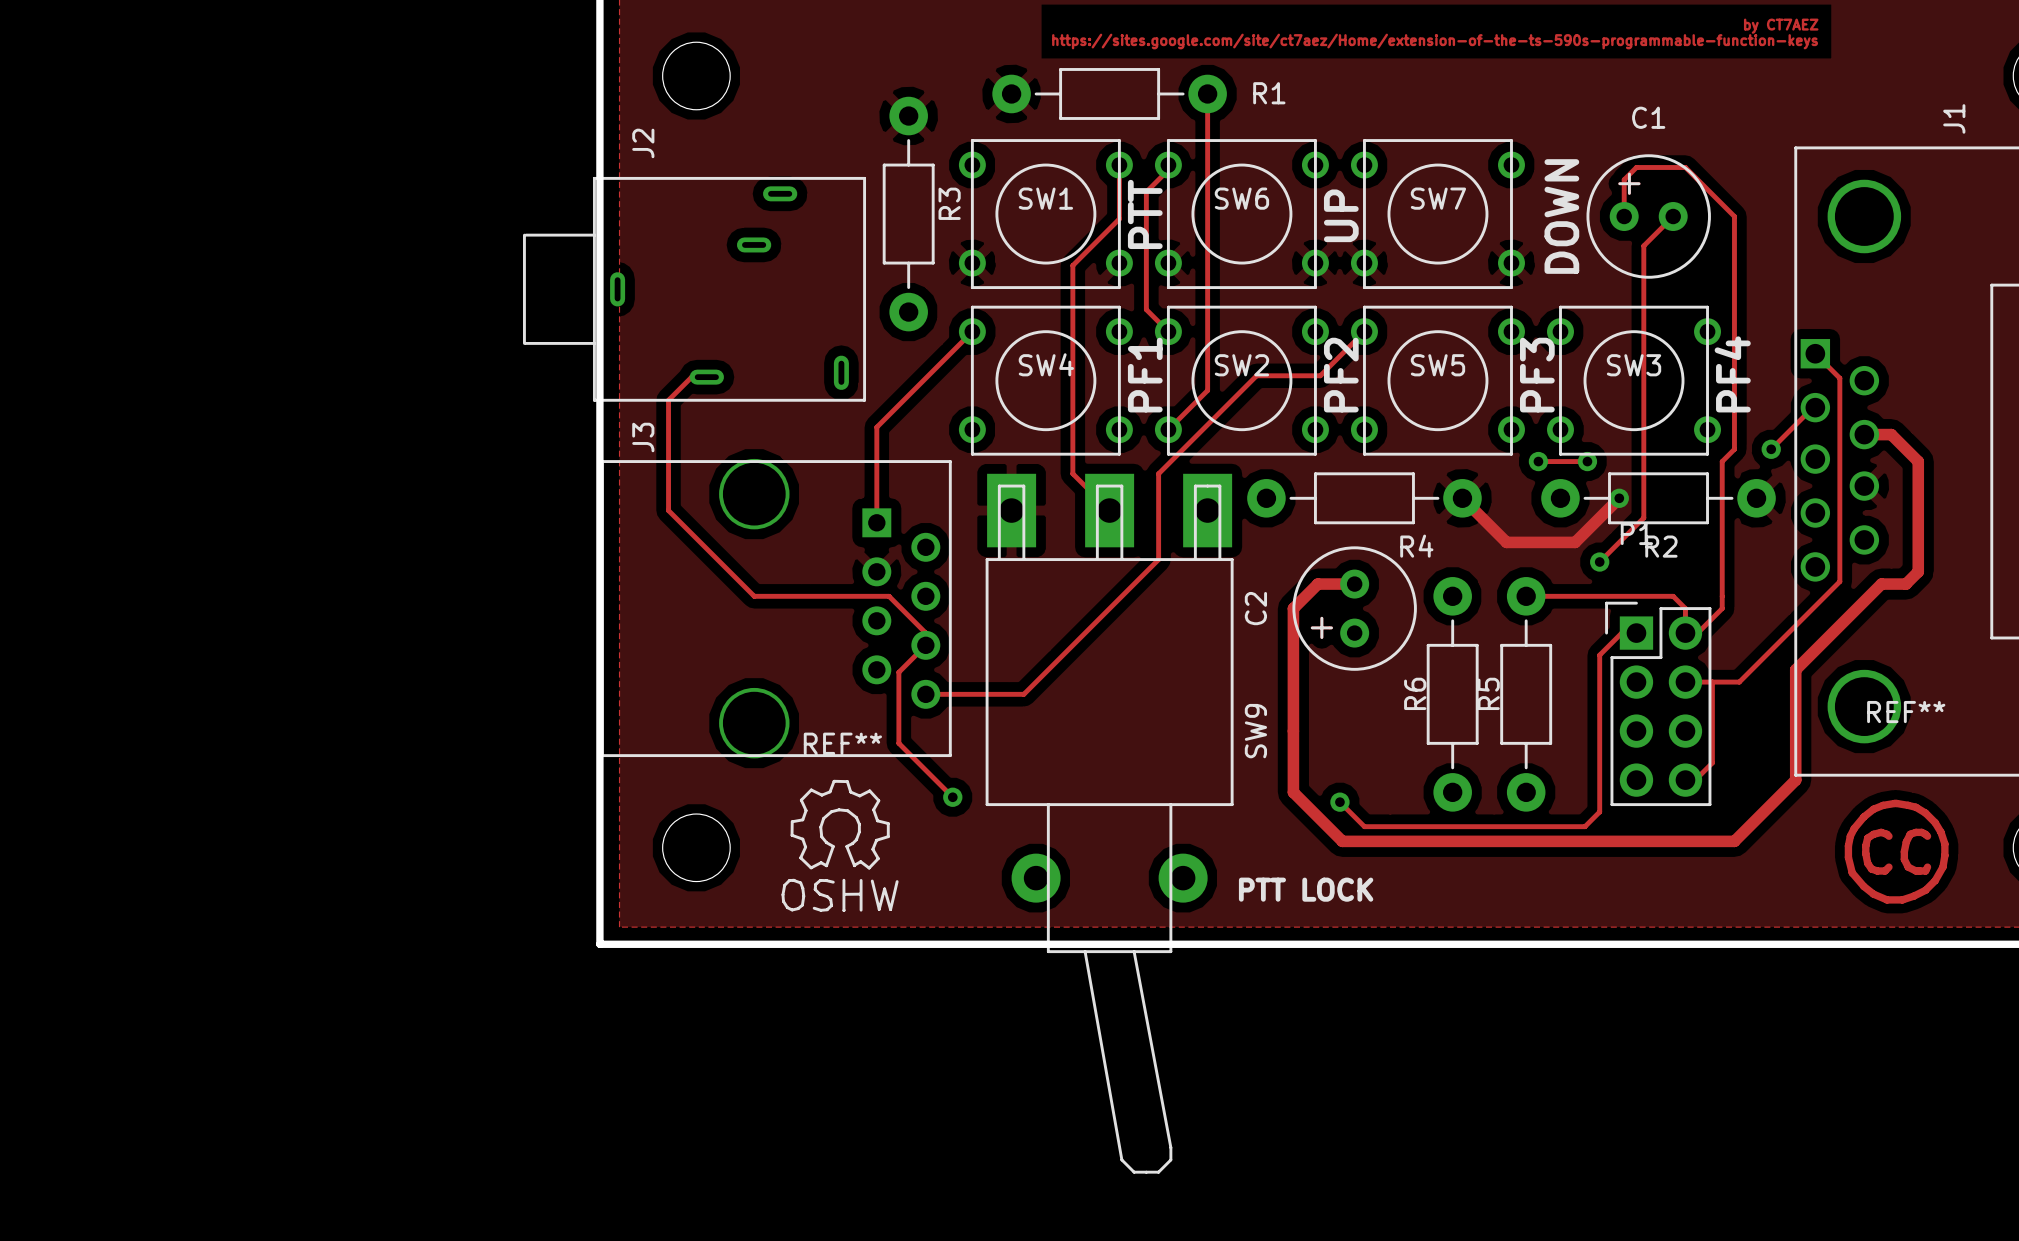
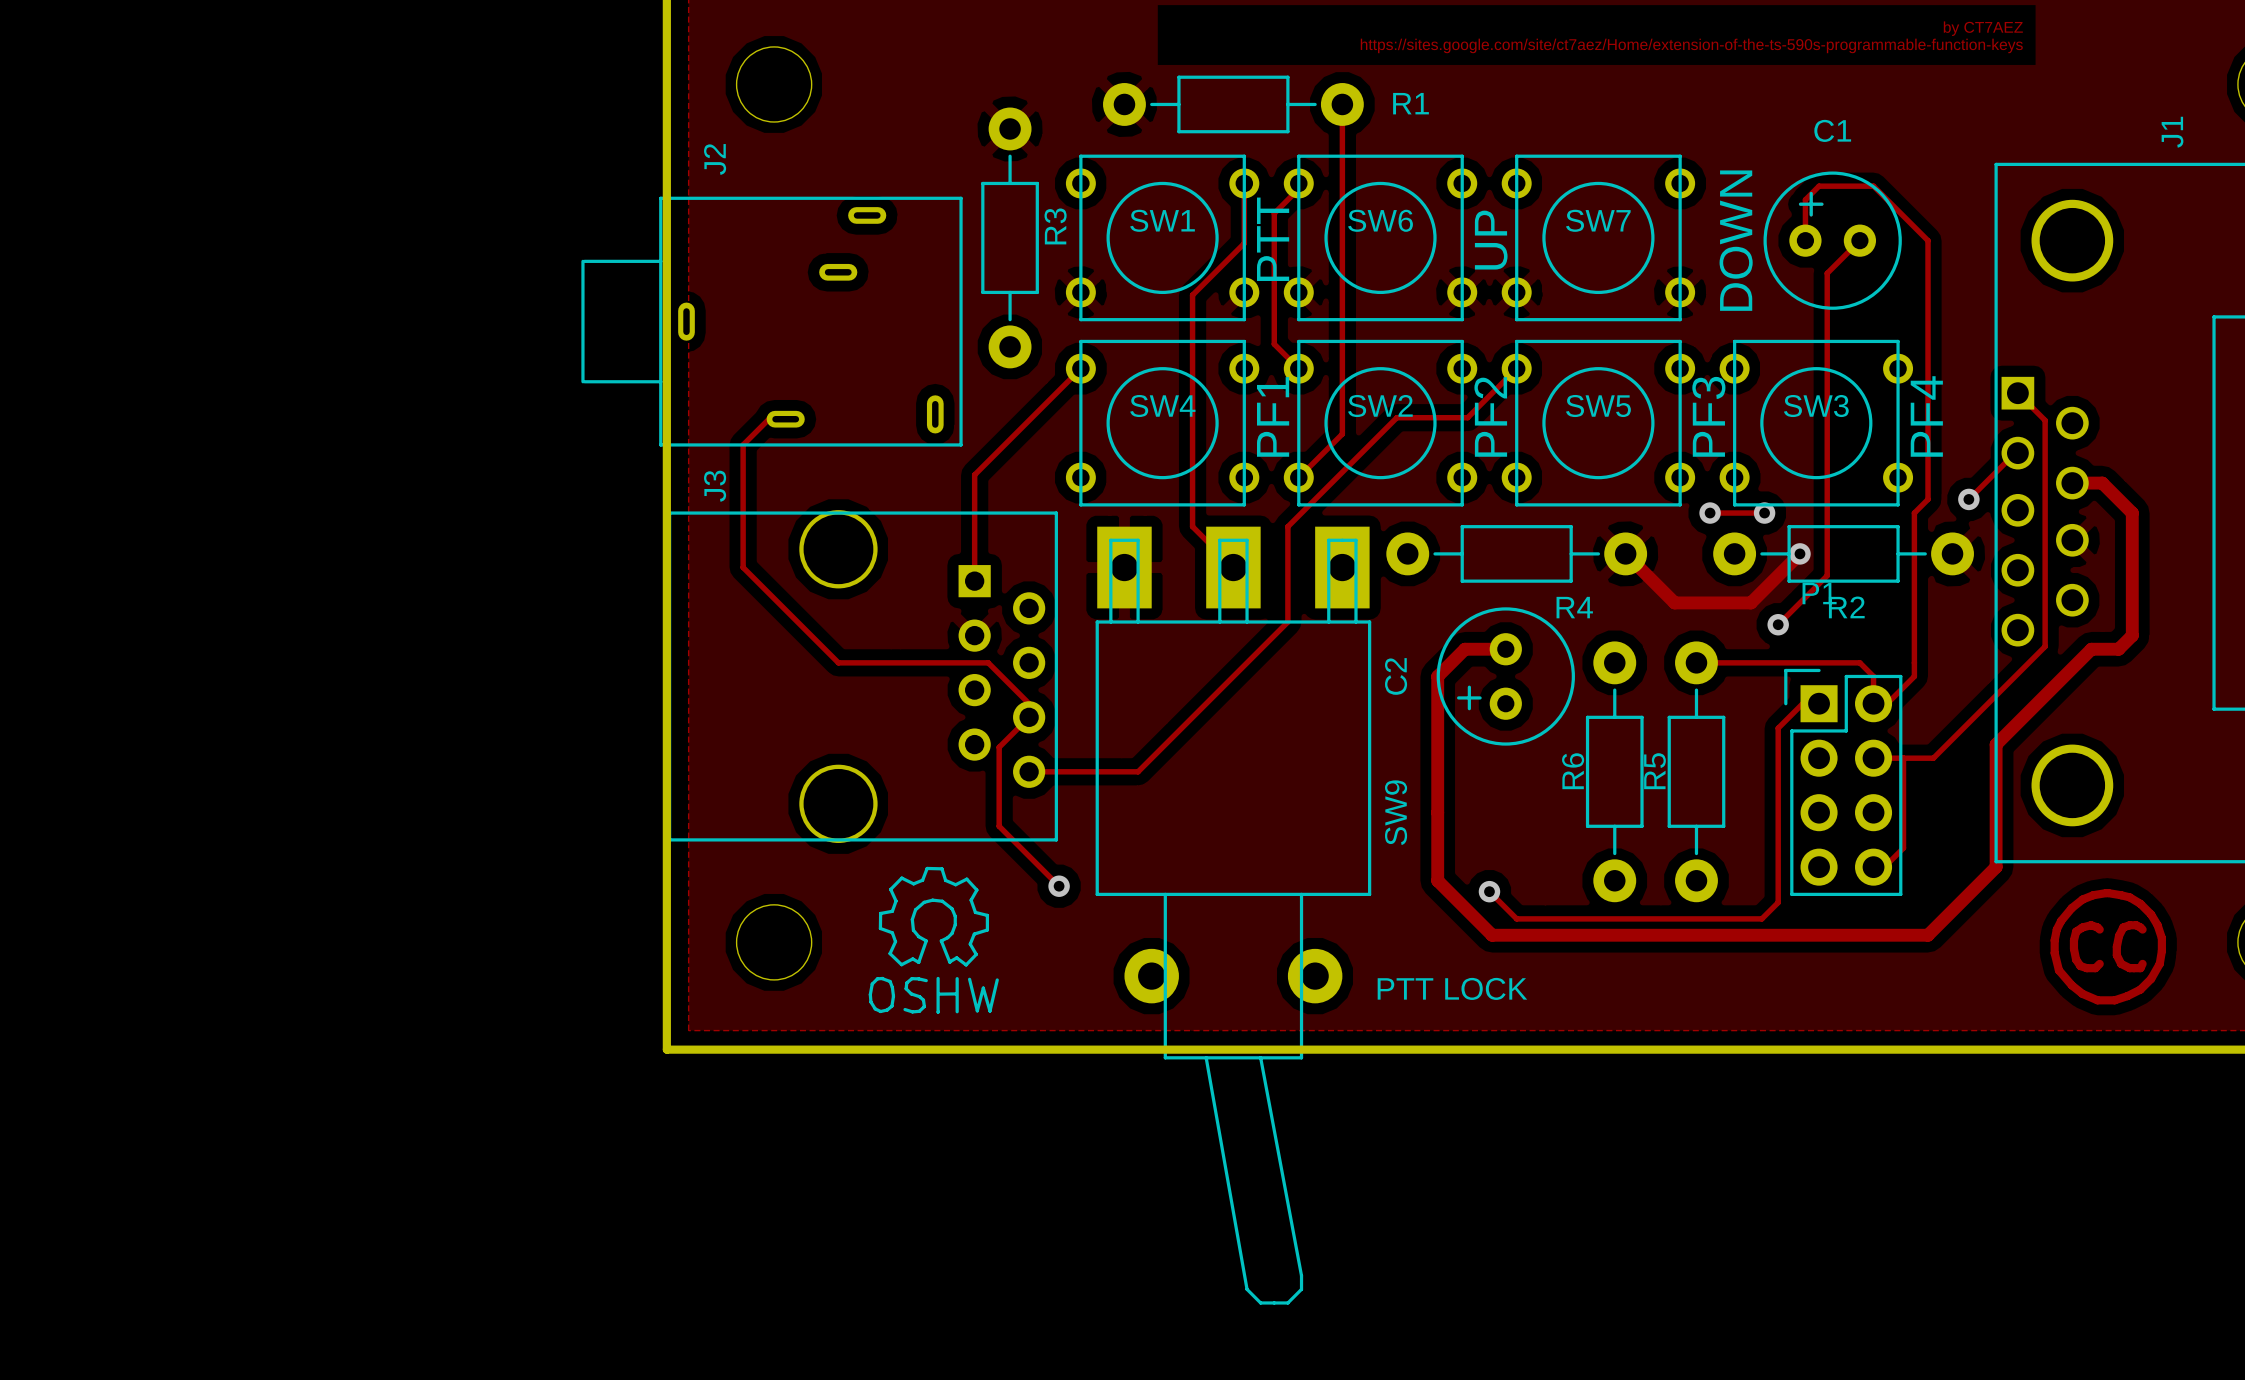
C2 footprint: [1292, 546, 1417, 671] -> [1436, 607, 1575, 746]
REF**: (840, 845) -> none
REF**: (1896, 851) -> none

